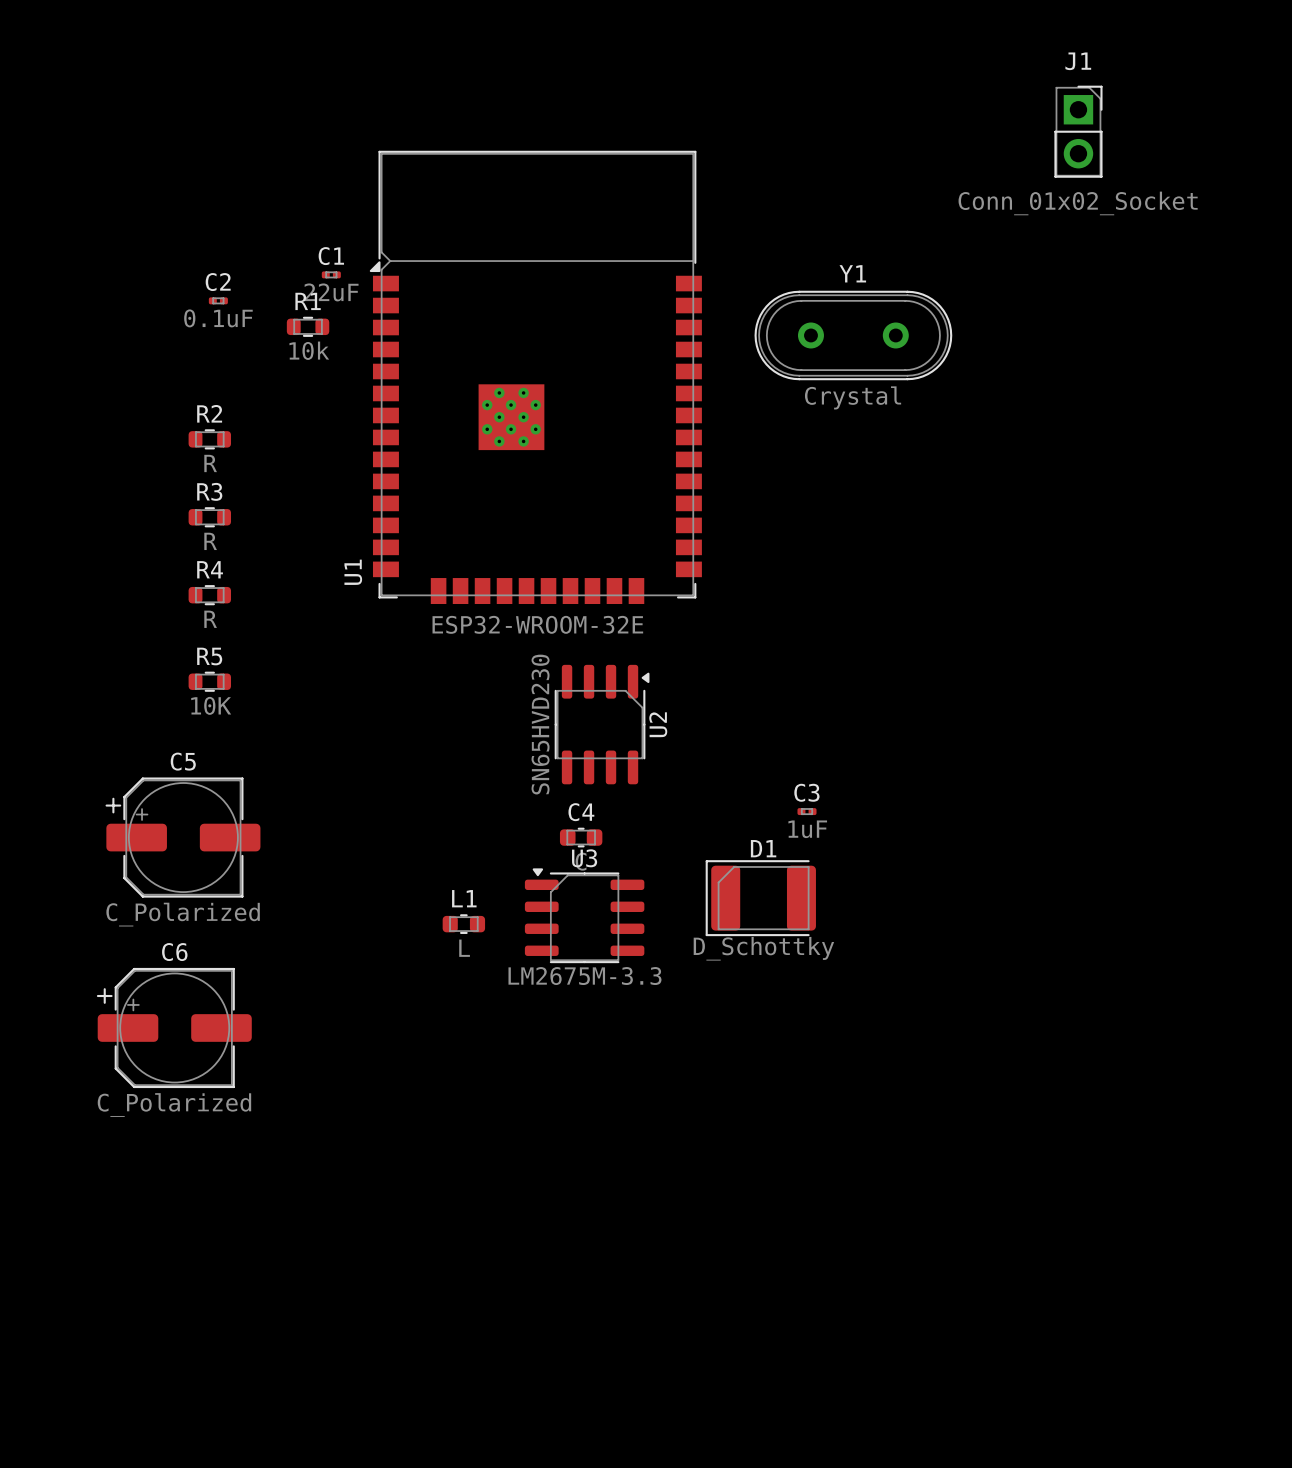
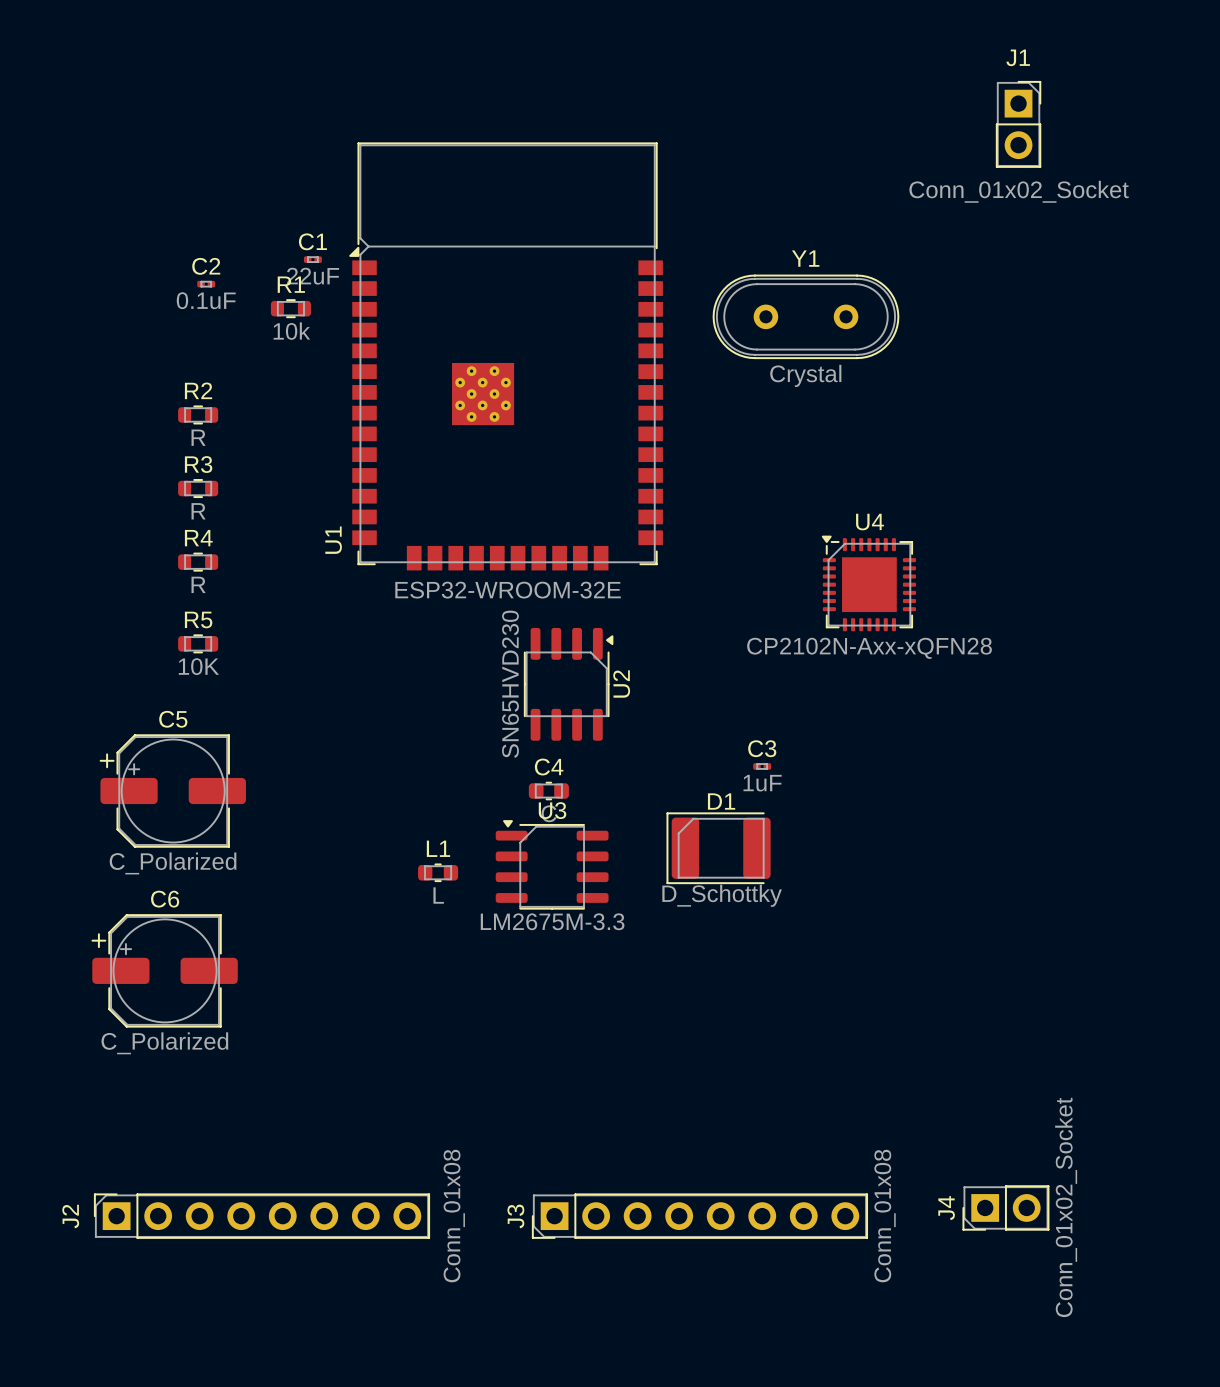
U4: none -> CP2102N-Axx-xQFN28 (868, 583)
J4: none -> Conn_01x02_Socket (1005, 1207)
J2: none -> Conn_01x08 (261, 1216)
J3: none -> Conn_01x08 (699, 1216)

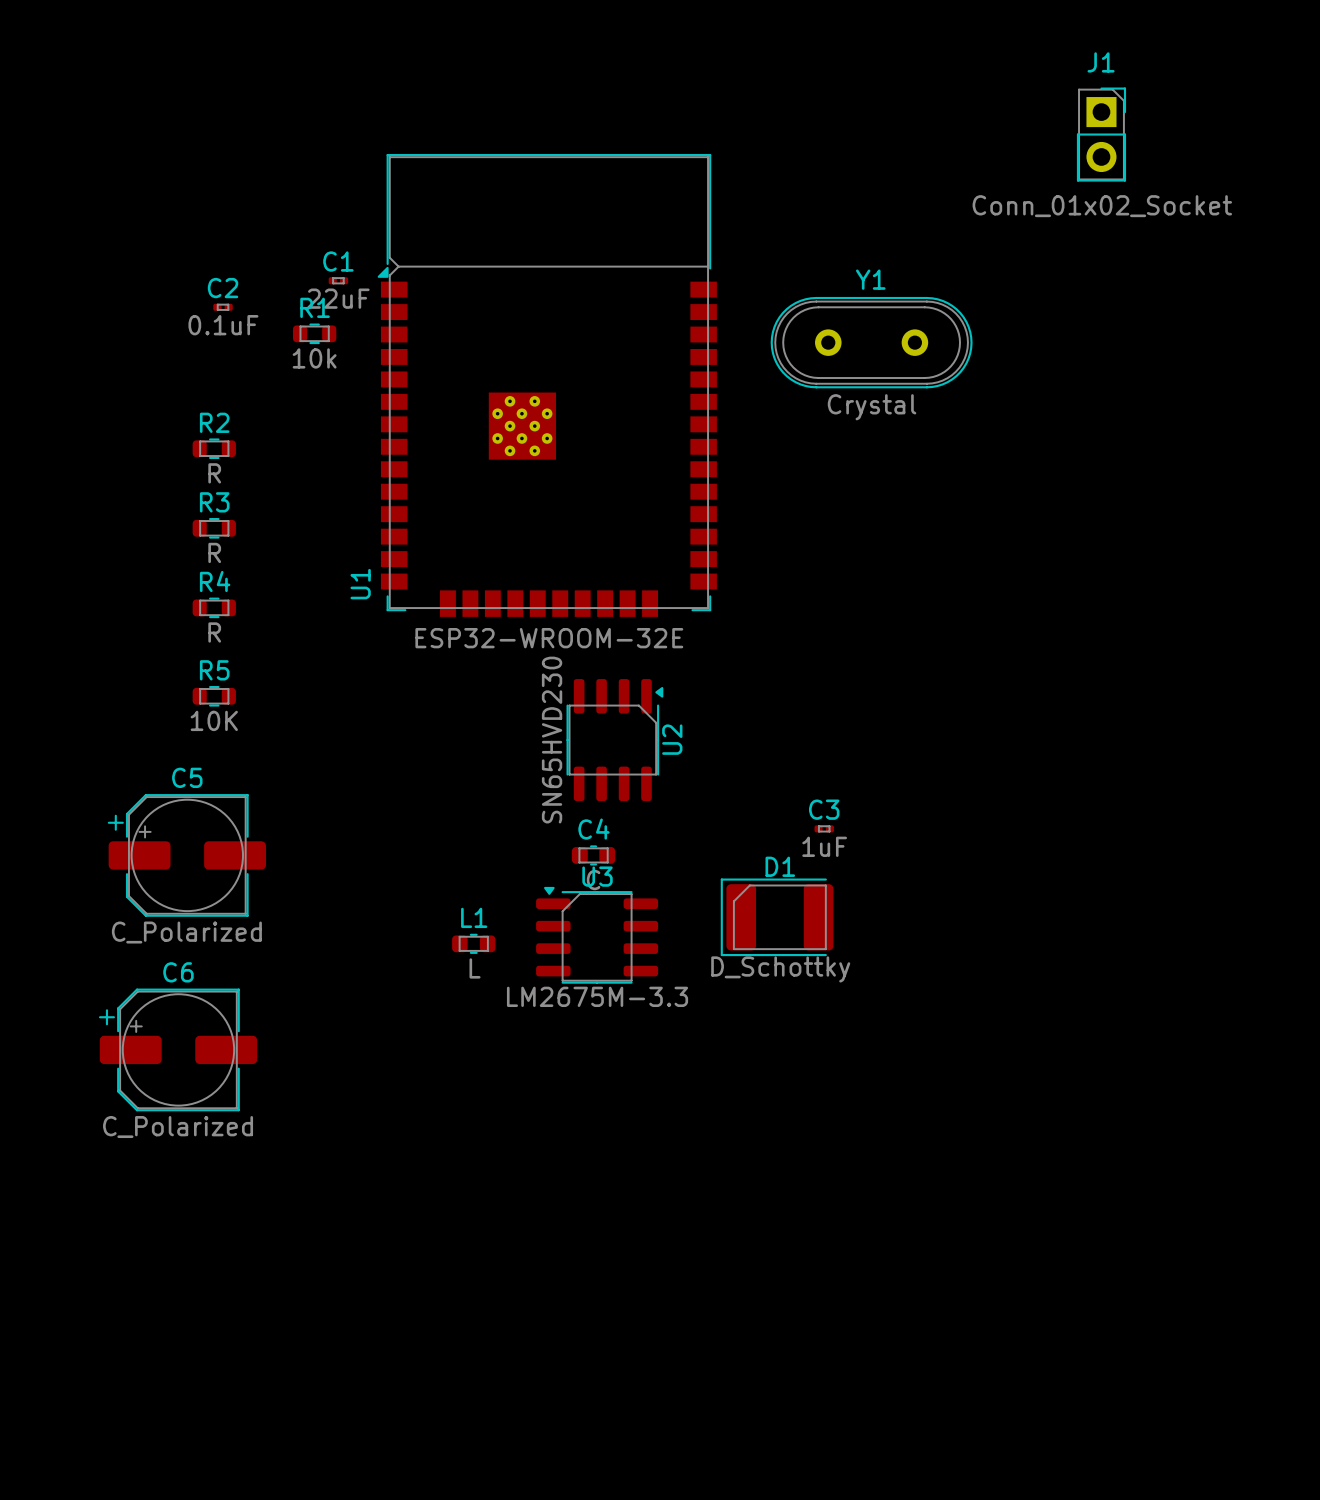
U4: CP2102N-Axx-xQFN28 (868, 583) -> none
J4: Conn_01x02_Socket (1005, 1207) -> none
J2: Conn_01x08 (261, 1216) -> none
J3: Conn_01x08 (699, 1216) -> none

